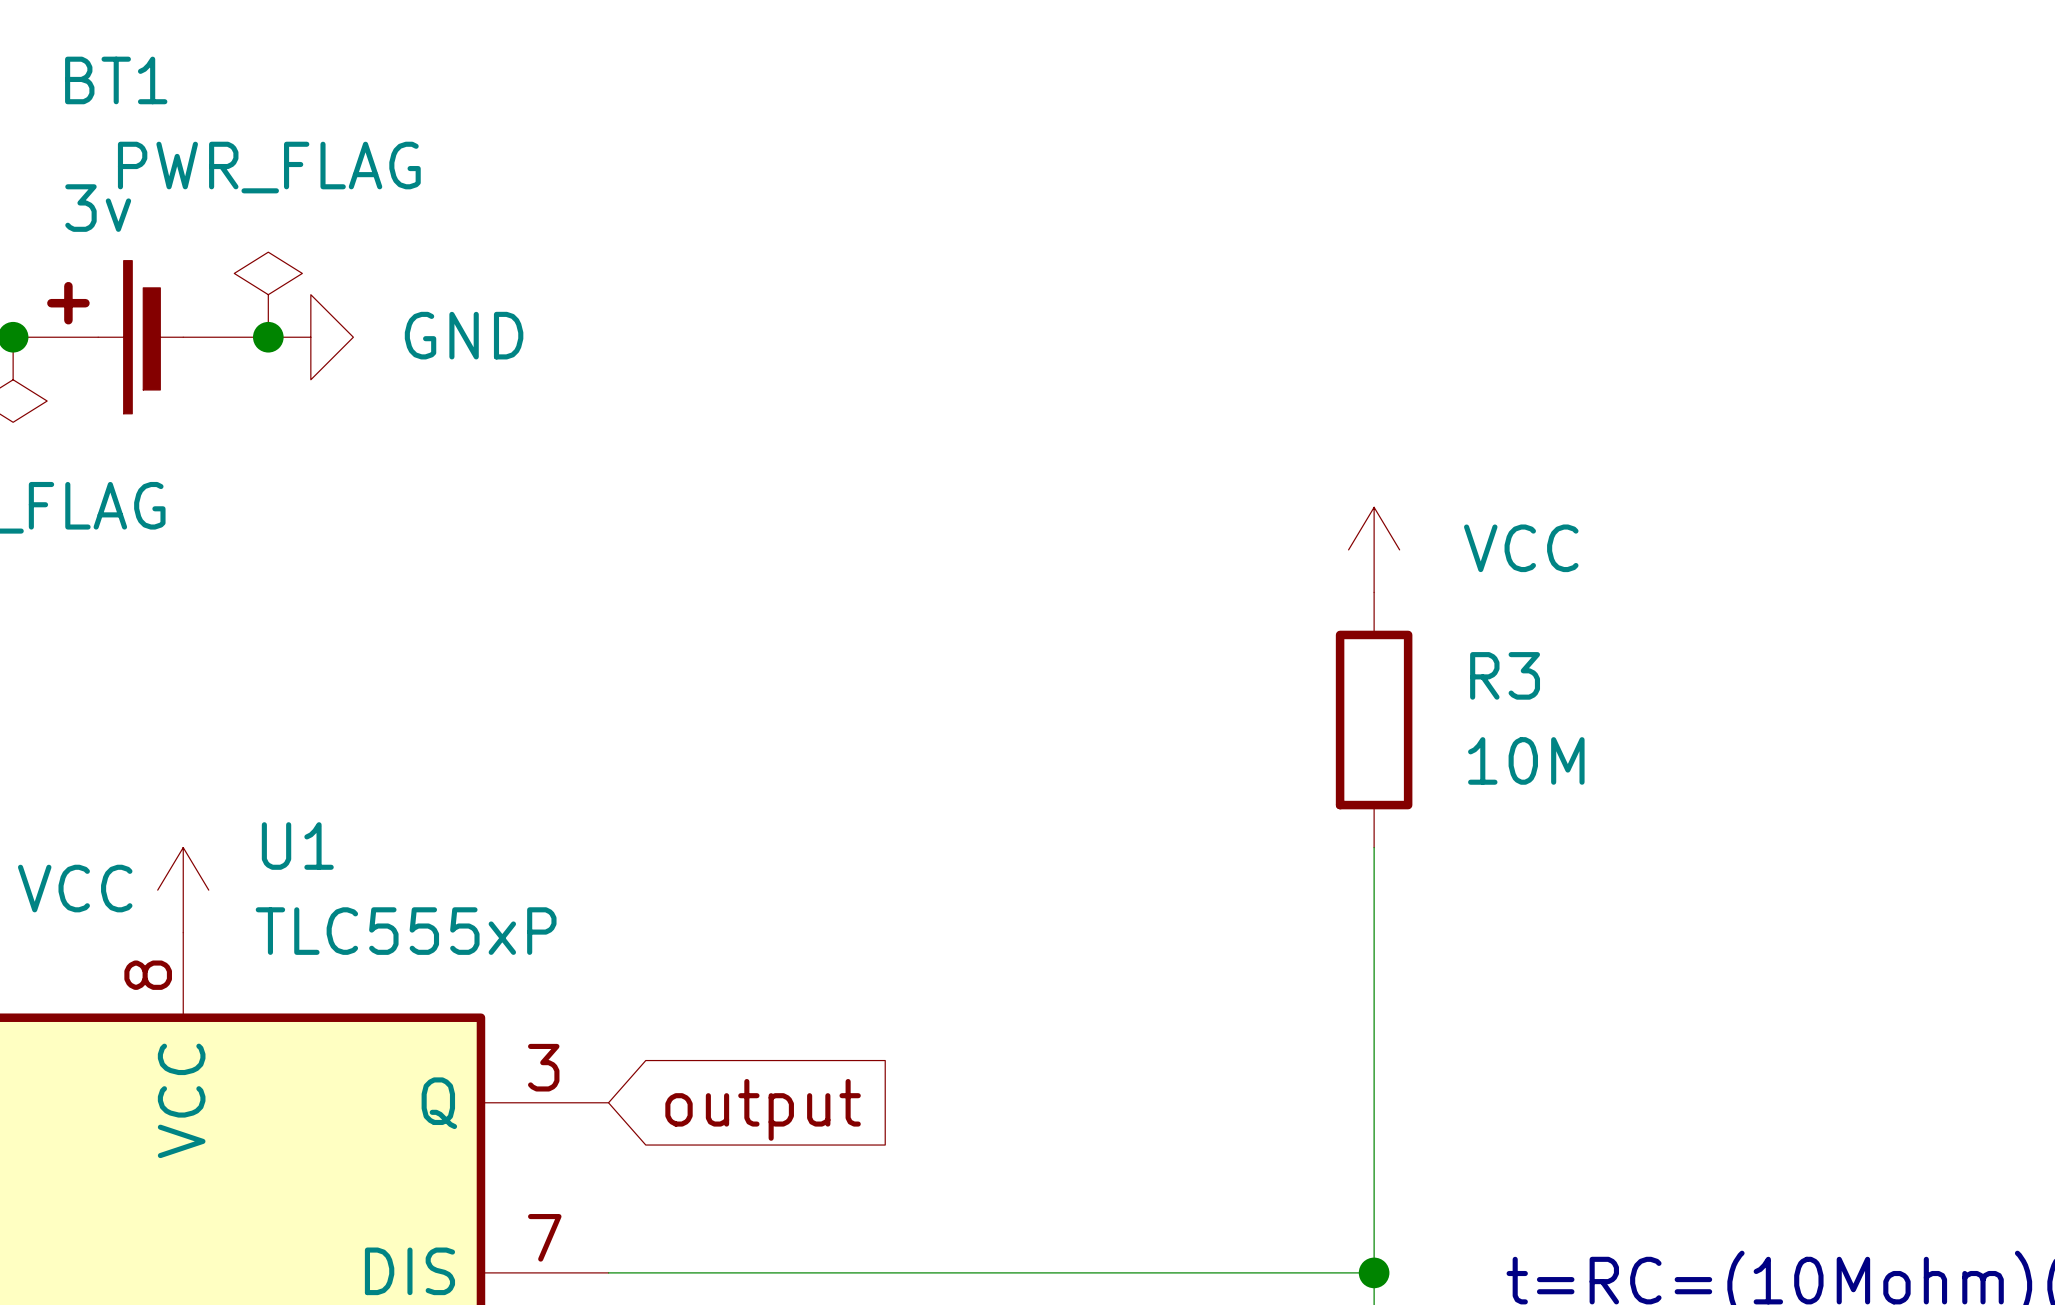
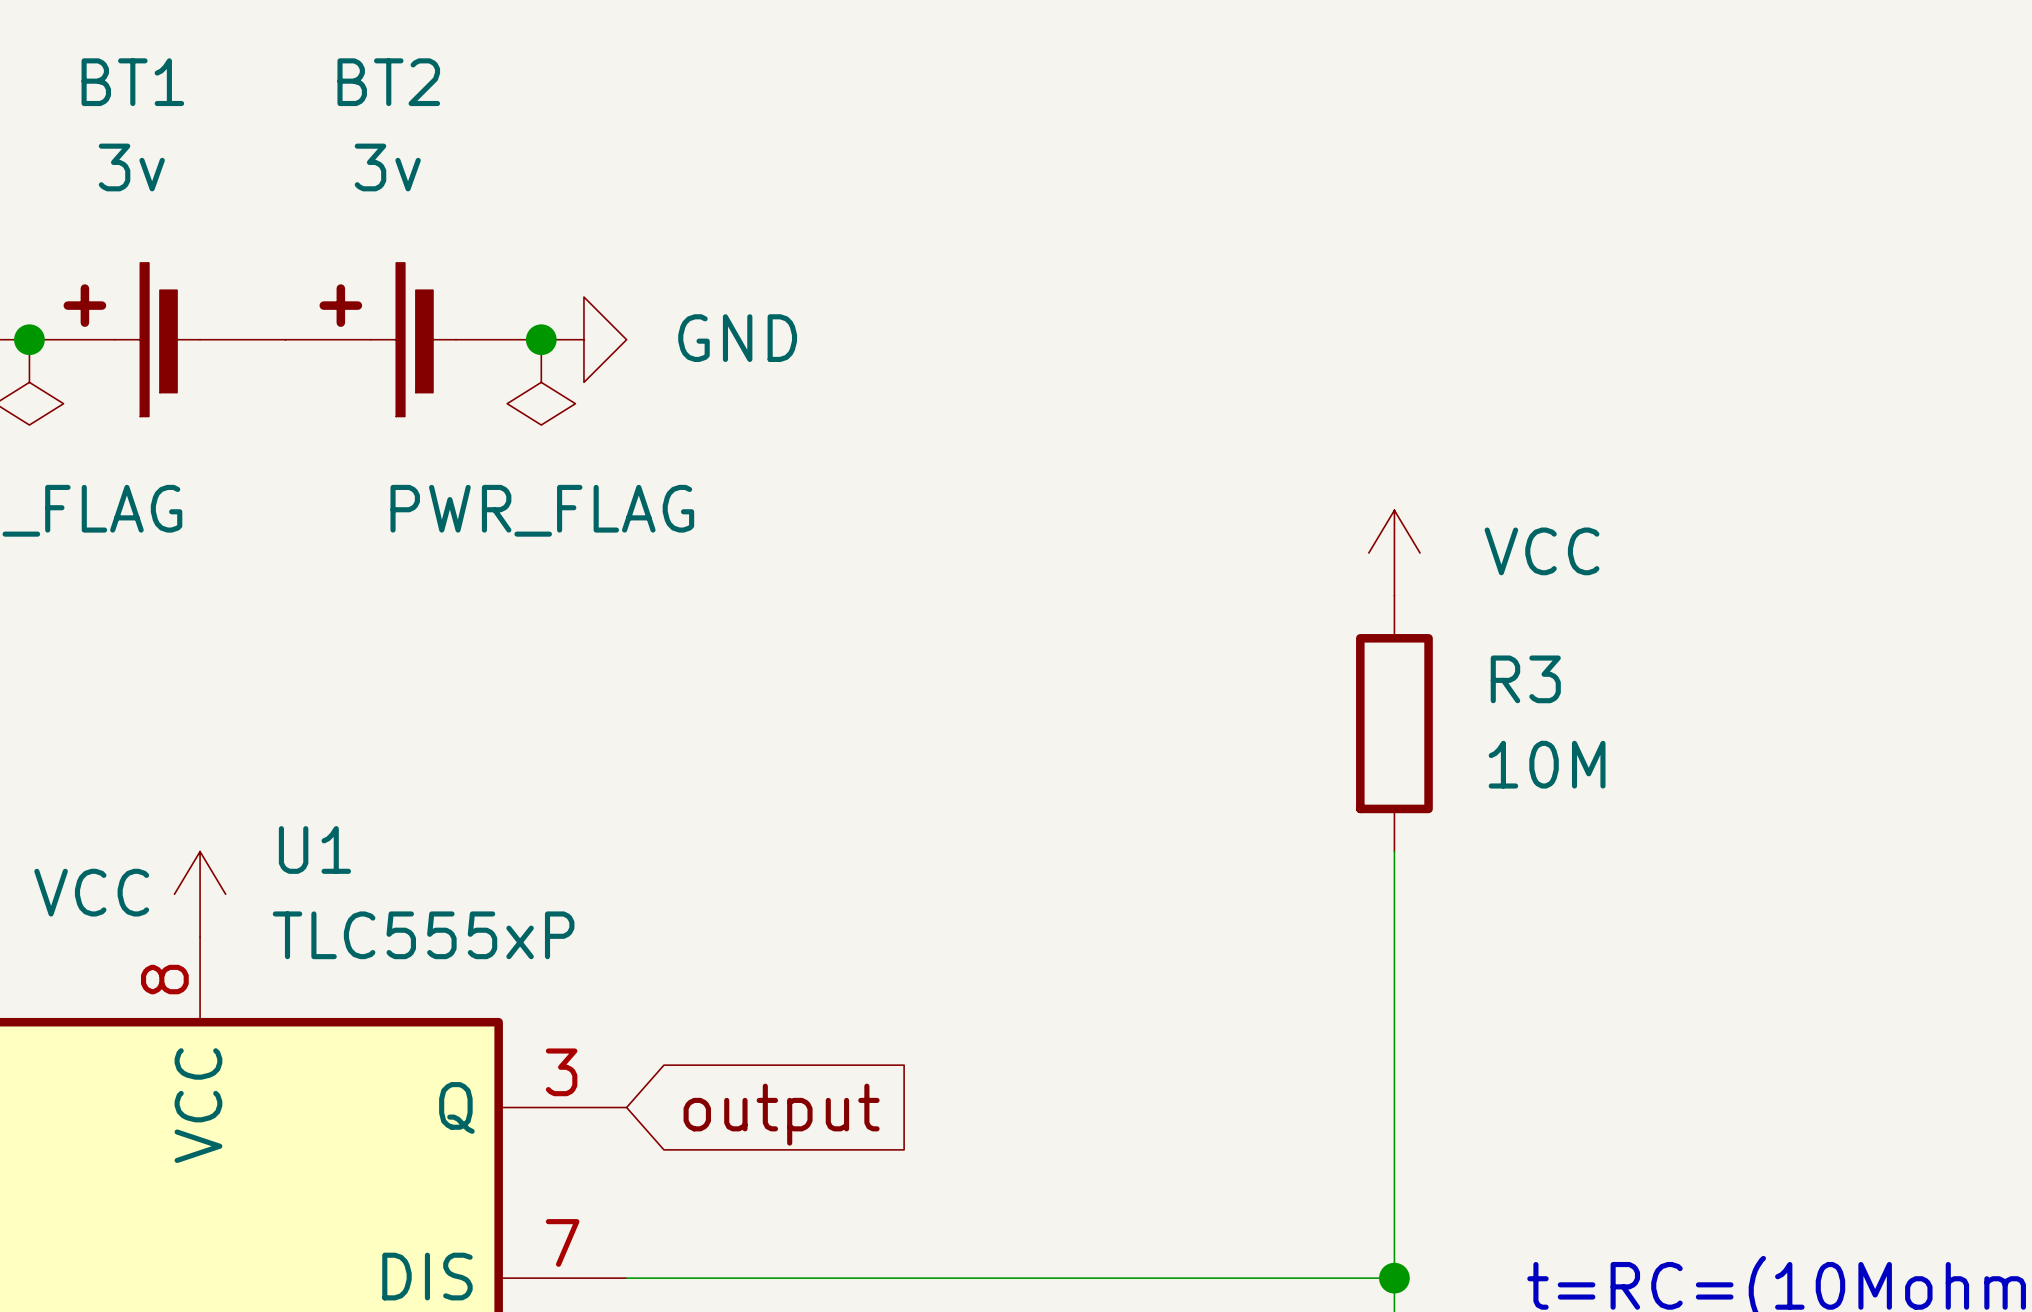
BT1 value position: 3v (98, 208) -> 3v (131, 167)
power symbol rotation: 0° (268, 294) -> 180° (541, 382)
power symbol position: PWR_FLAG (268, 294) -> PWR_FLAG (541, 382)
junction: (268, 337) -> none
power symbol position: GND (310, 337) -> GND (583, 339)
BT2: none -> 3v (413, 339)
junction: none -> (541, 339)

